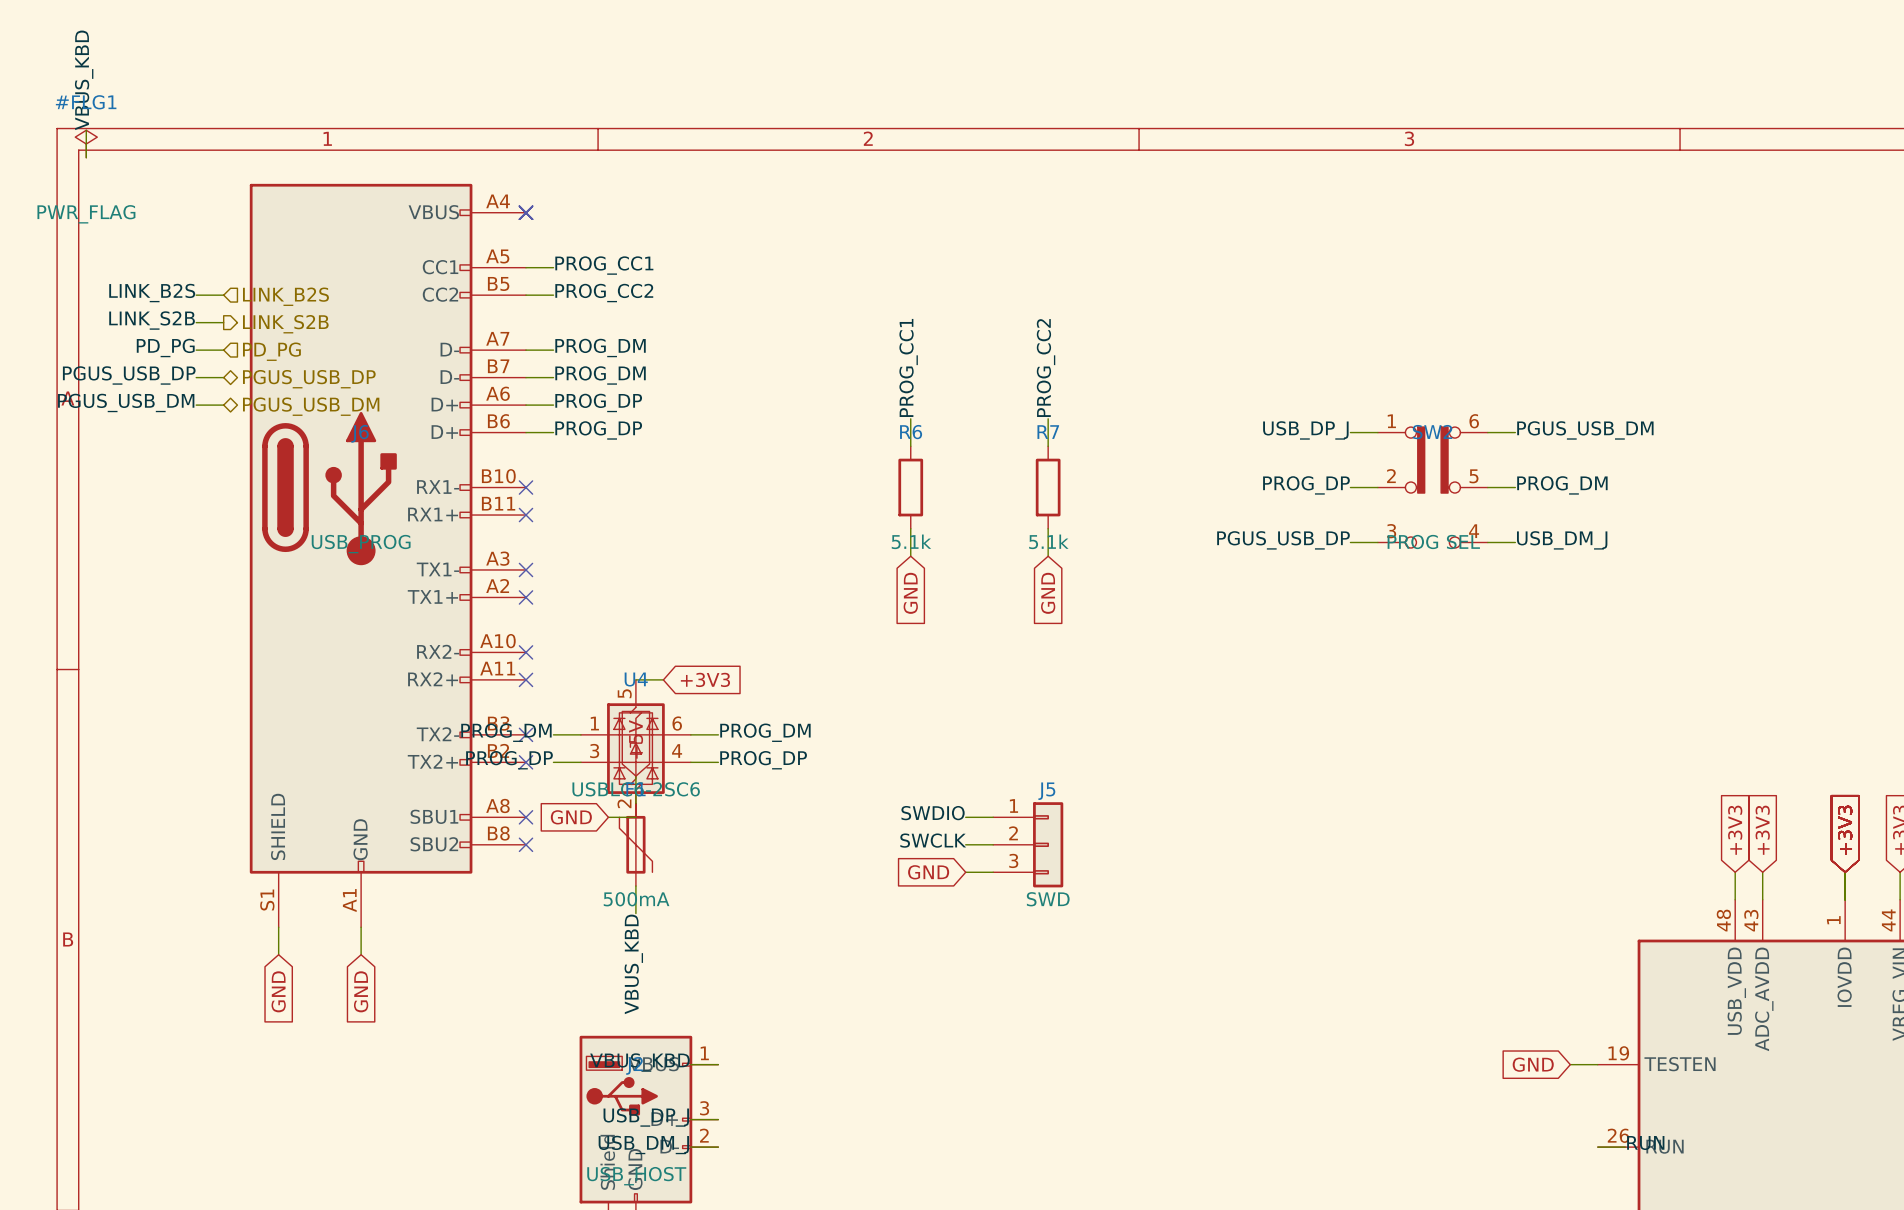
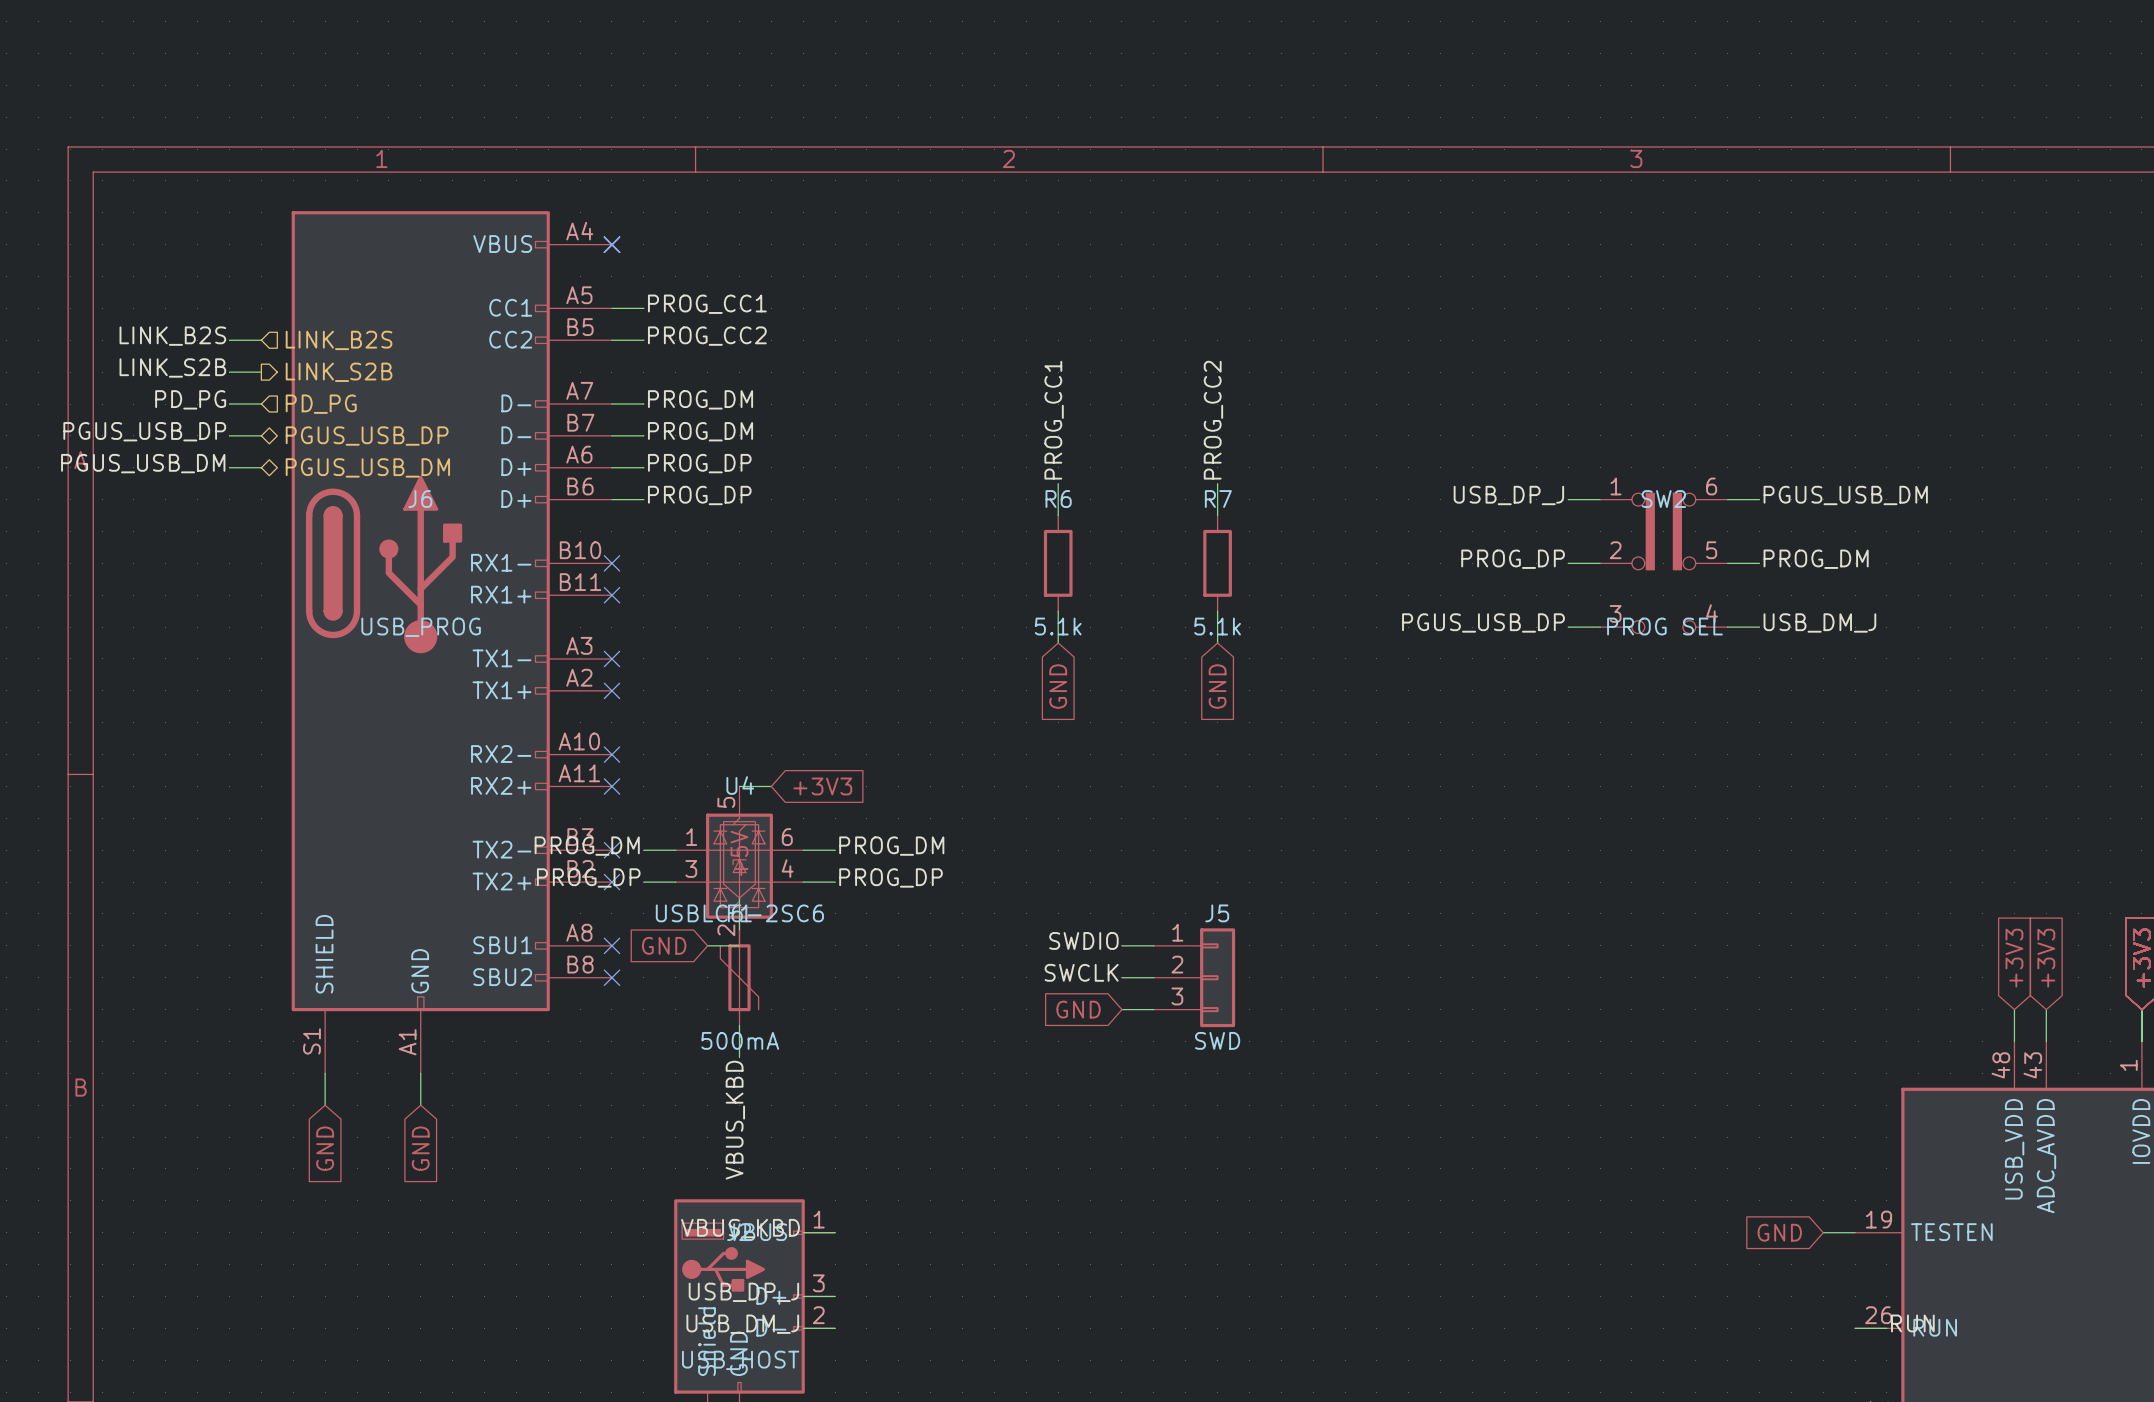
label: VBUS_KBD (84, 80) -> none
wire: (86, 130) (86, 157) -> none
#FLG1: PWR_FLAG (86, 144) -> none

